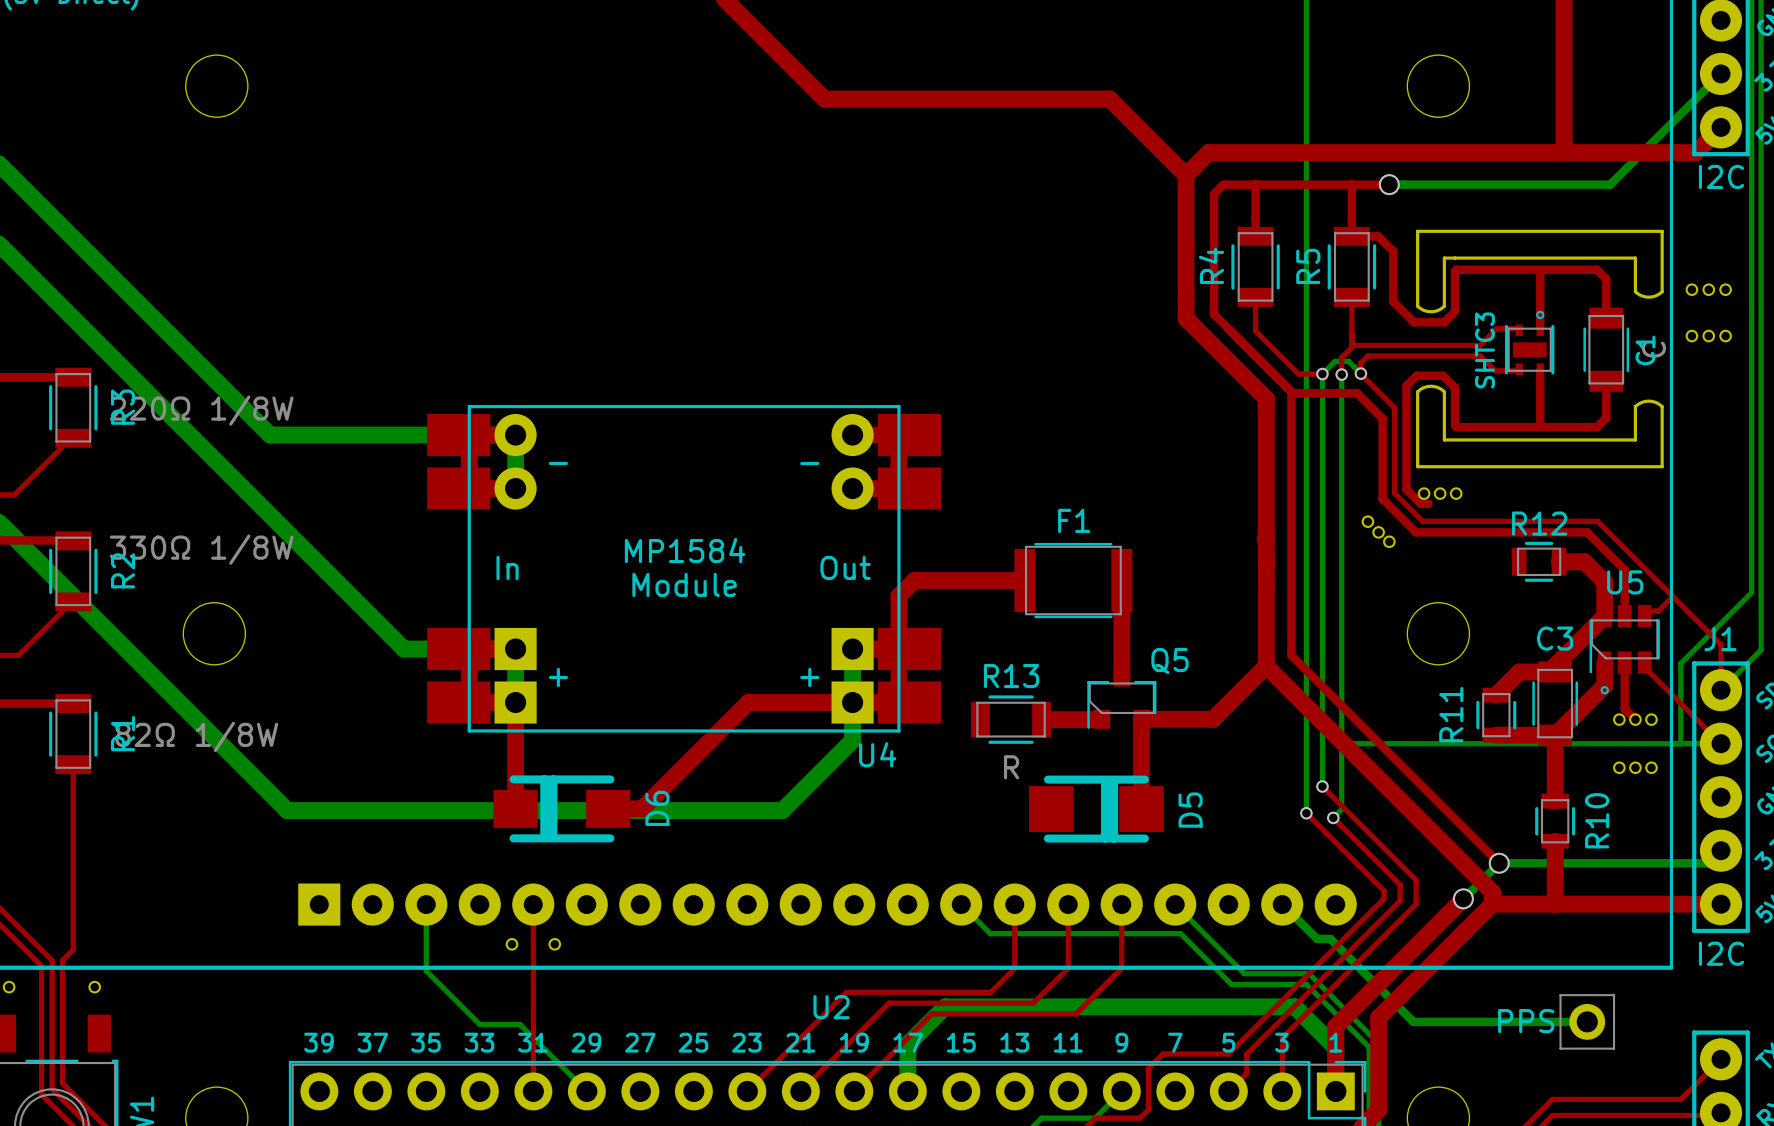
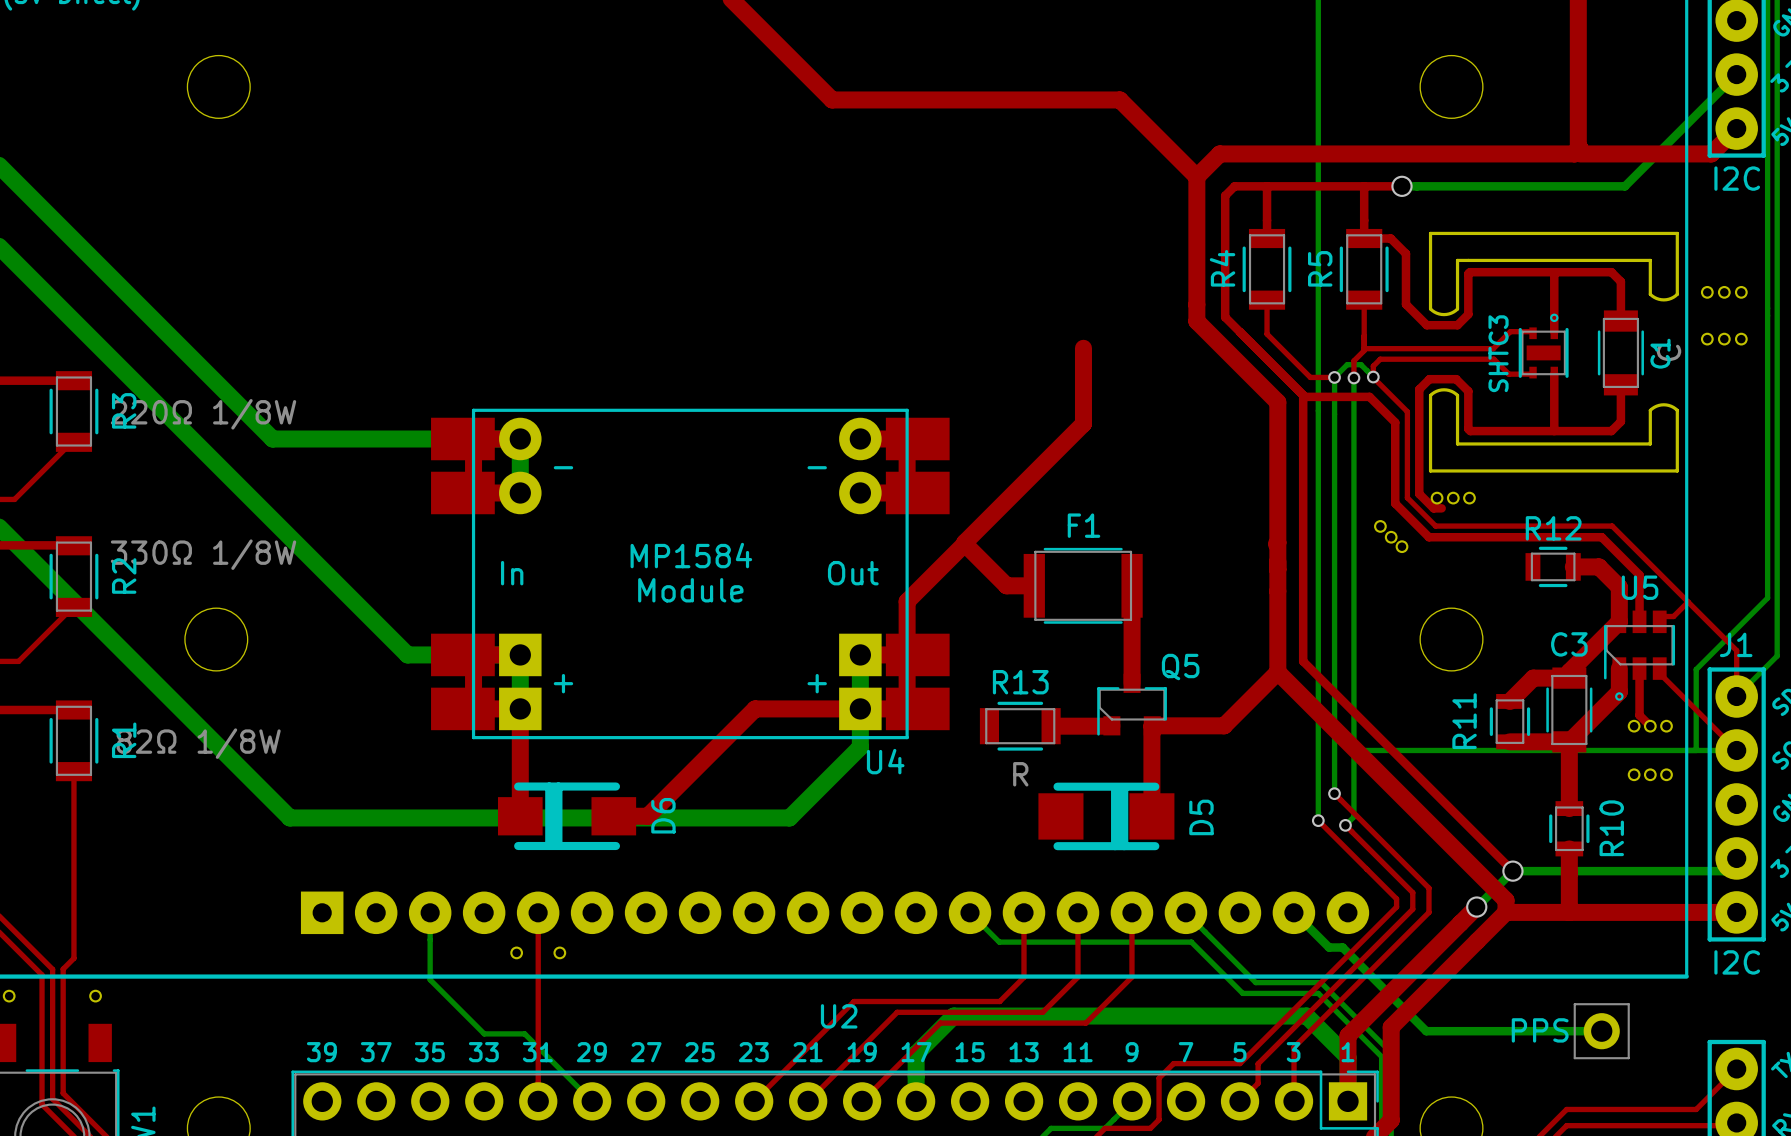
top track: none -> (1083, 348) (1083, 423)
top track: none -> (1083, 424) (964, 543)
top track: none -> (964, 543) (1006, 585)
top track: (914, 580) (997, 580) -> (922, 585) (964, 543)

